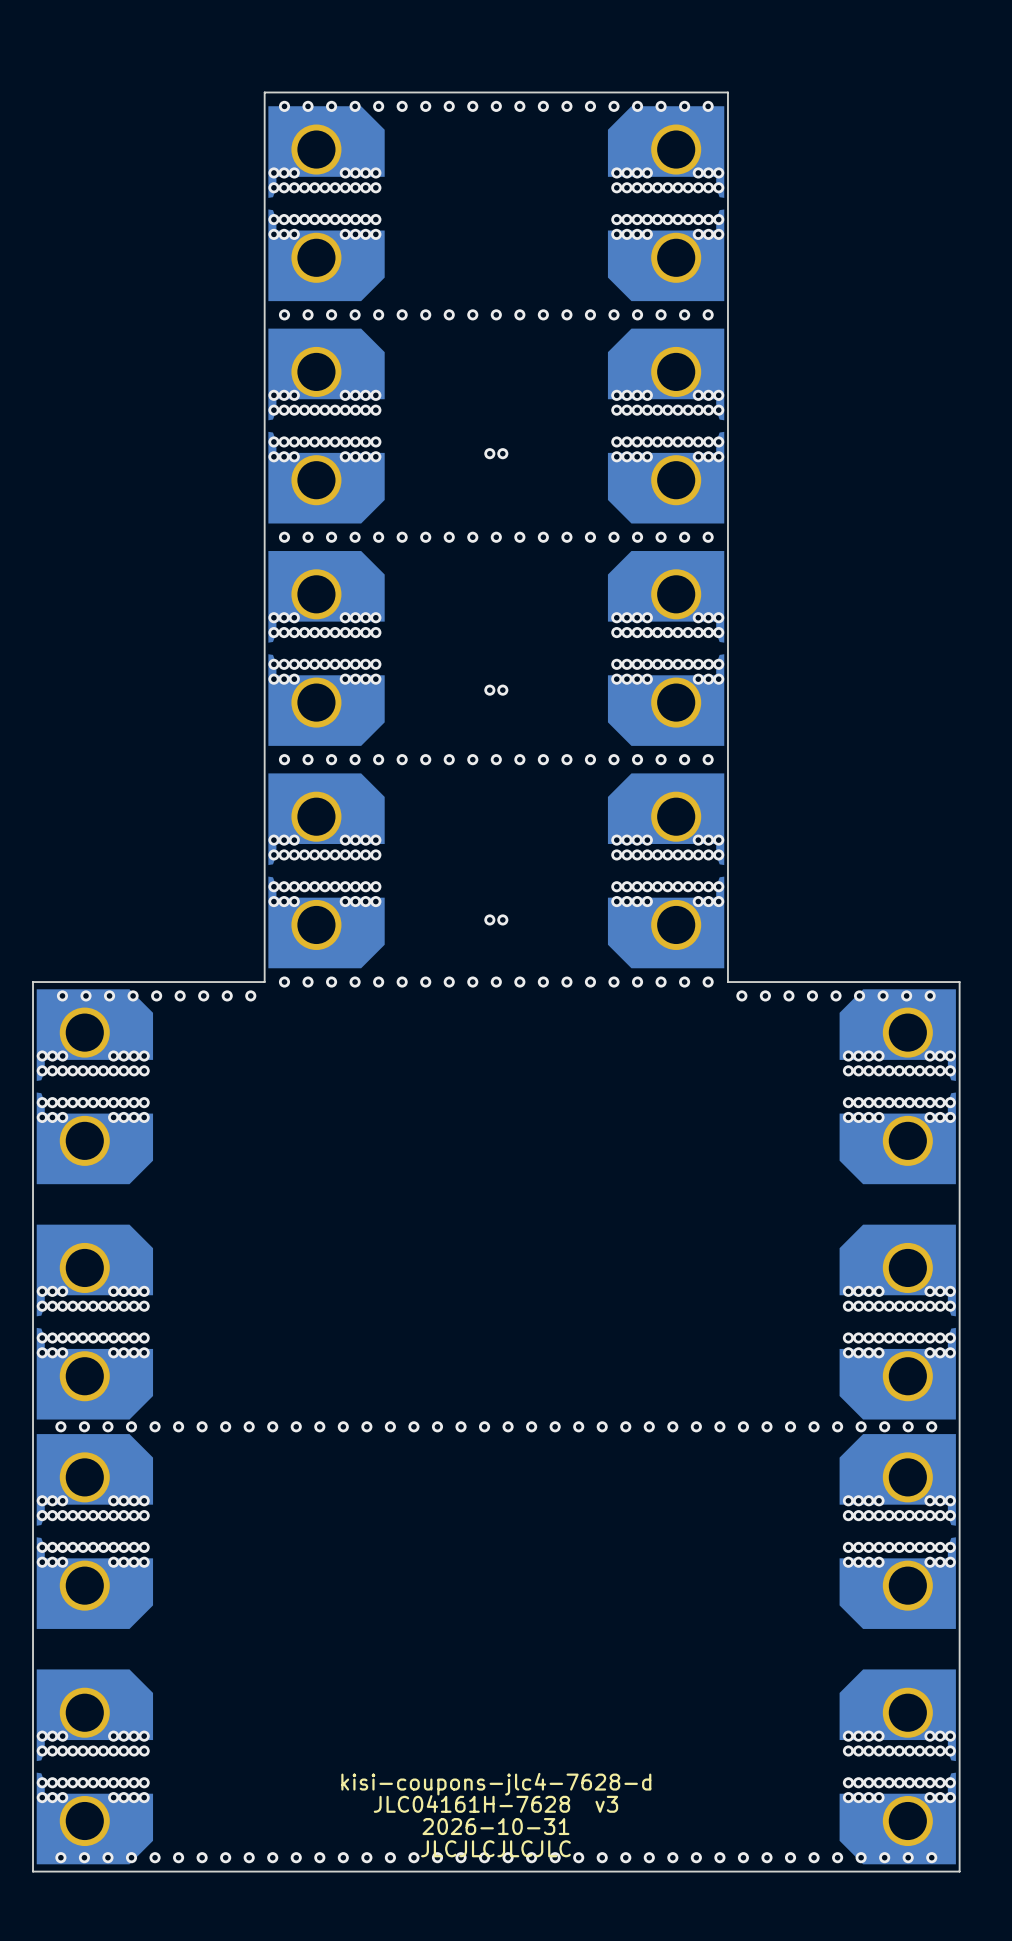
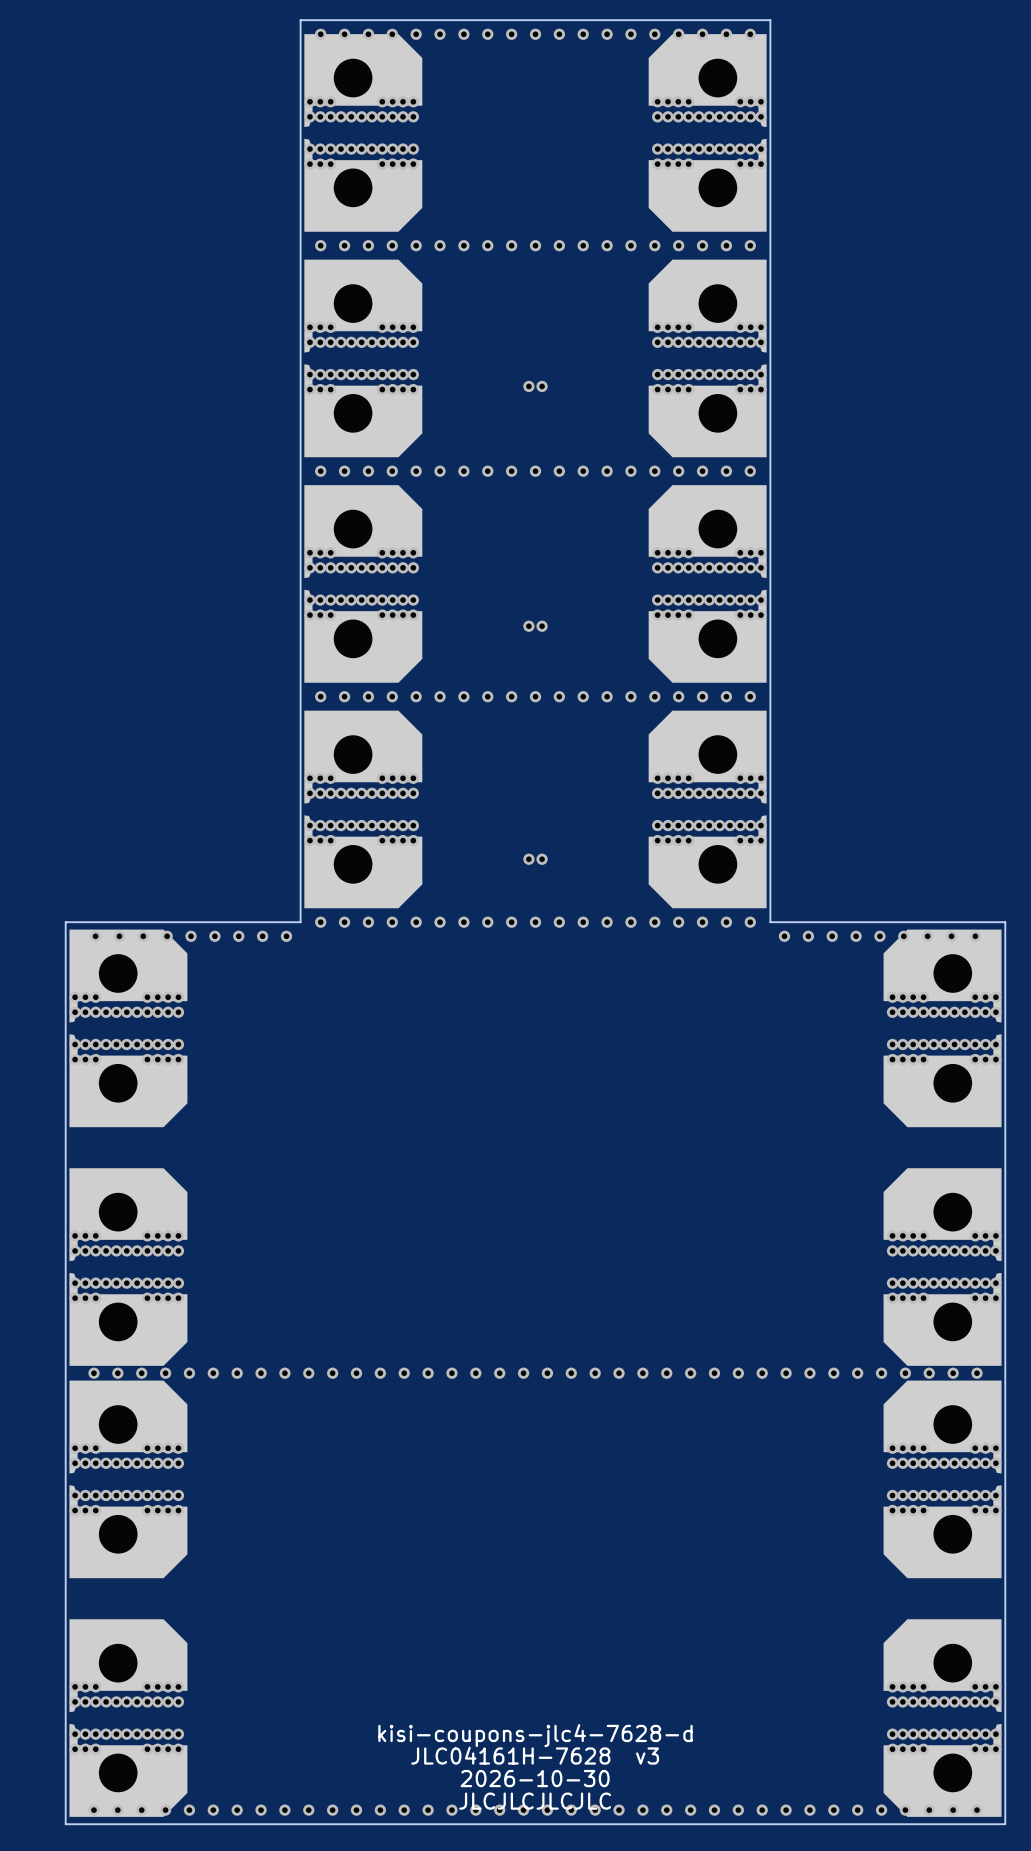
text: 2026-10-31 (495, 1826) -> 2026-10-30 (535, 1778)

